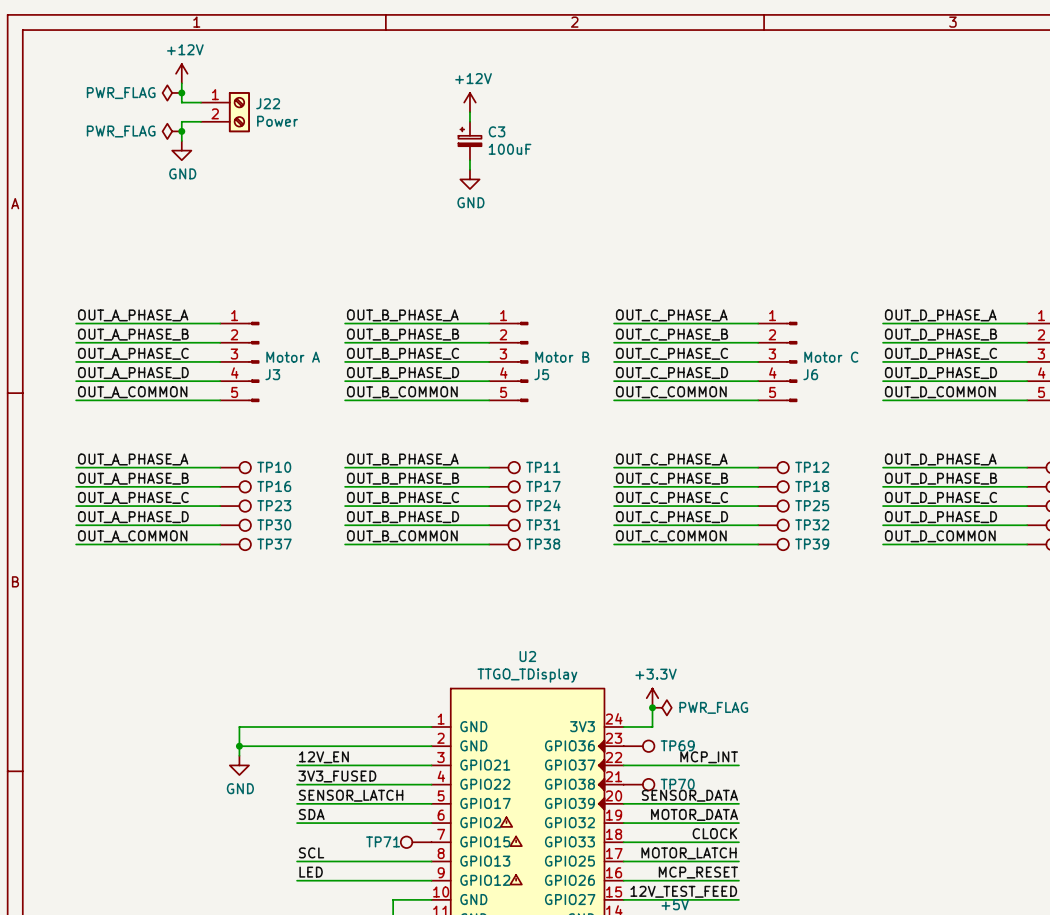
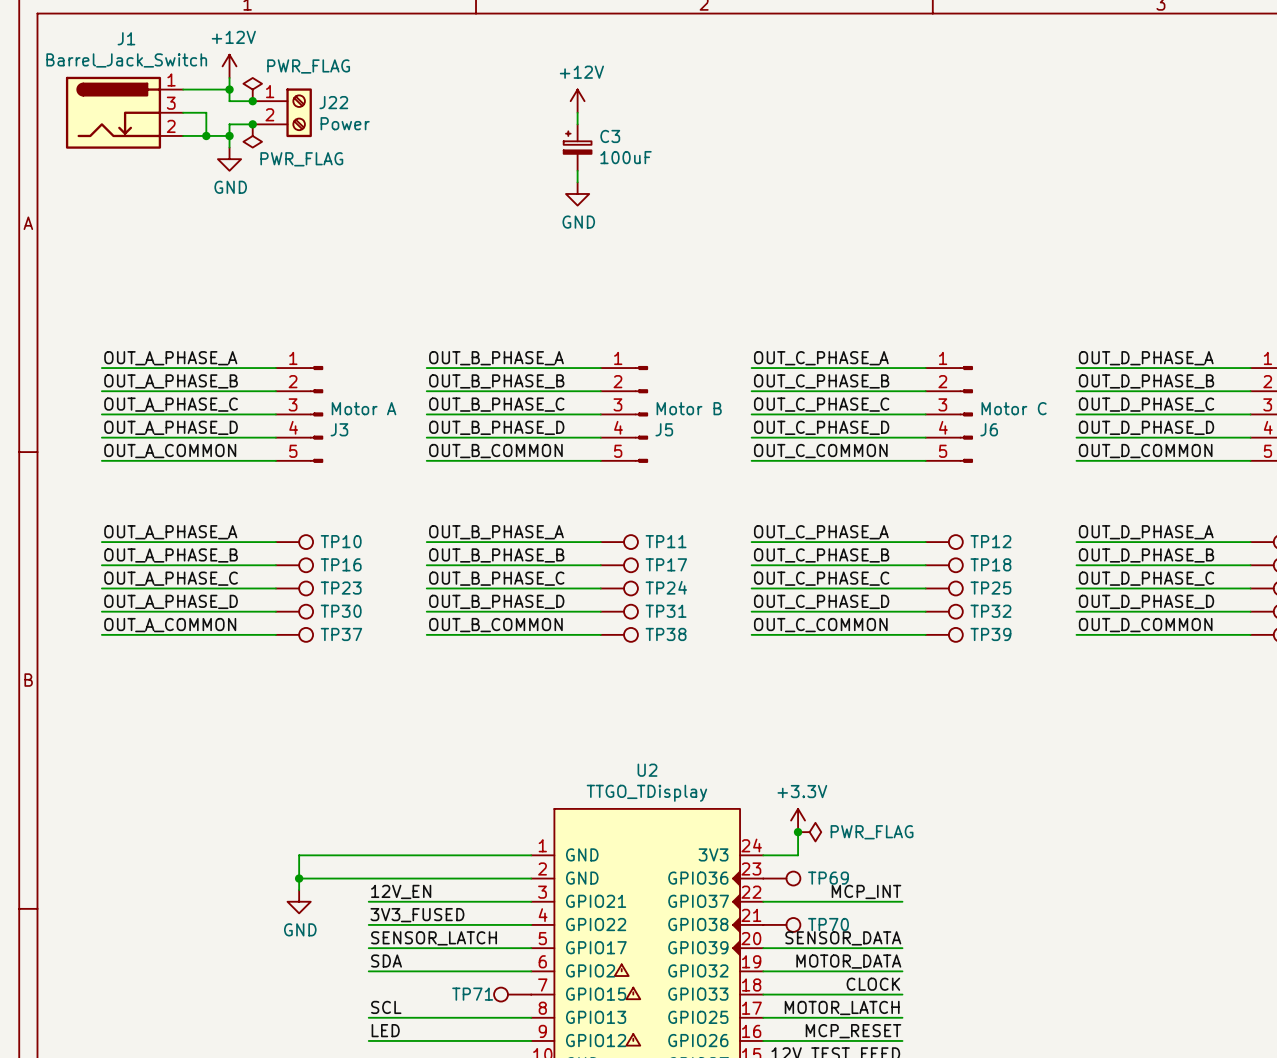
wire: none -> (183, 89) (229, 89)
power symbol: PWR_FLAG (172, 92) -> none
power symbol: none -> PWR_FLAG (252, 89)
junction: none -> (252, 101)
J1: none -> Barrel_Jack_Switch (124, 112)
wire: none -> (183, 112) (206, 112) (206, 135)
junction: none -> (252, 124)
wire: none -> (183, 135) (229, 135)
junction: none -> (206, 135)
power symbol: PWR_FLAG (172, 131) -> none
power symbol: none -> PWR_FLAG (252, 135)

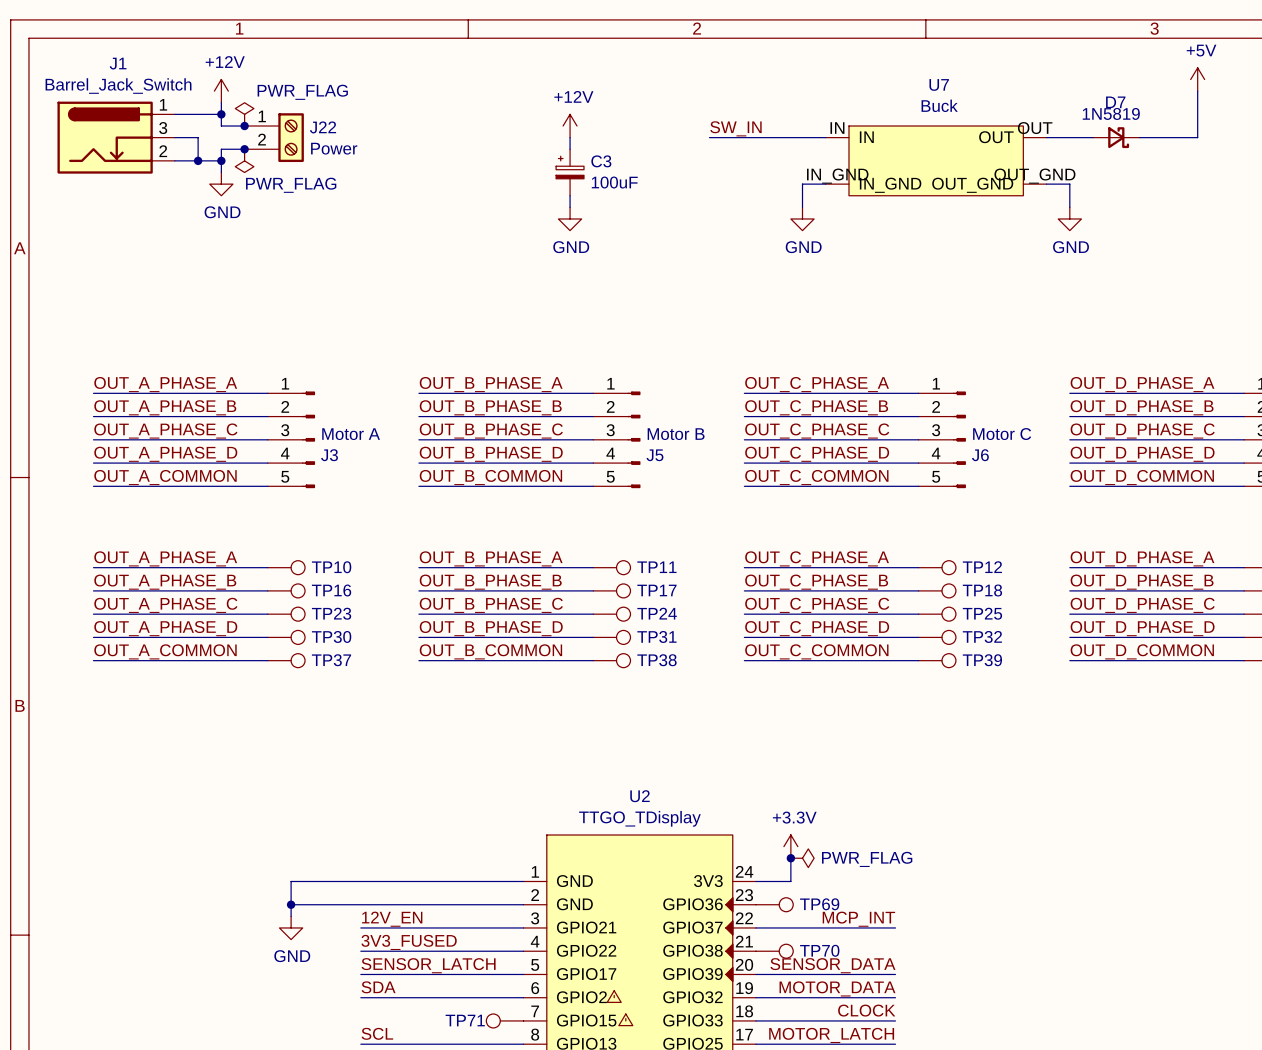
power symbol: none -> +5V (1197, 79)
wire: none -> (1197, 91) (1197, 137) (1139, 137)
label: none -> SW_IN (735, 128)
wire: none -> (709, 137) (825, 137)
wire: none -> (1046, 137) (1093, 137)
D7: none -> 1N5819 (1116, 137)
U7: none -> Buck (936, 160)
wire: none -> (825, 184) (802, 184) (802, 207)
wire: none -> (1046, 184) (1069, 184) (1069, 207)
power symbol: none -> GND (802, 218)
power symbol: none -> GND (1069, 218)

